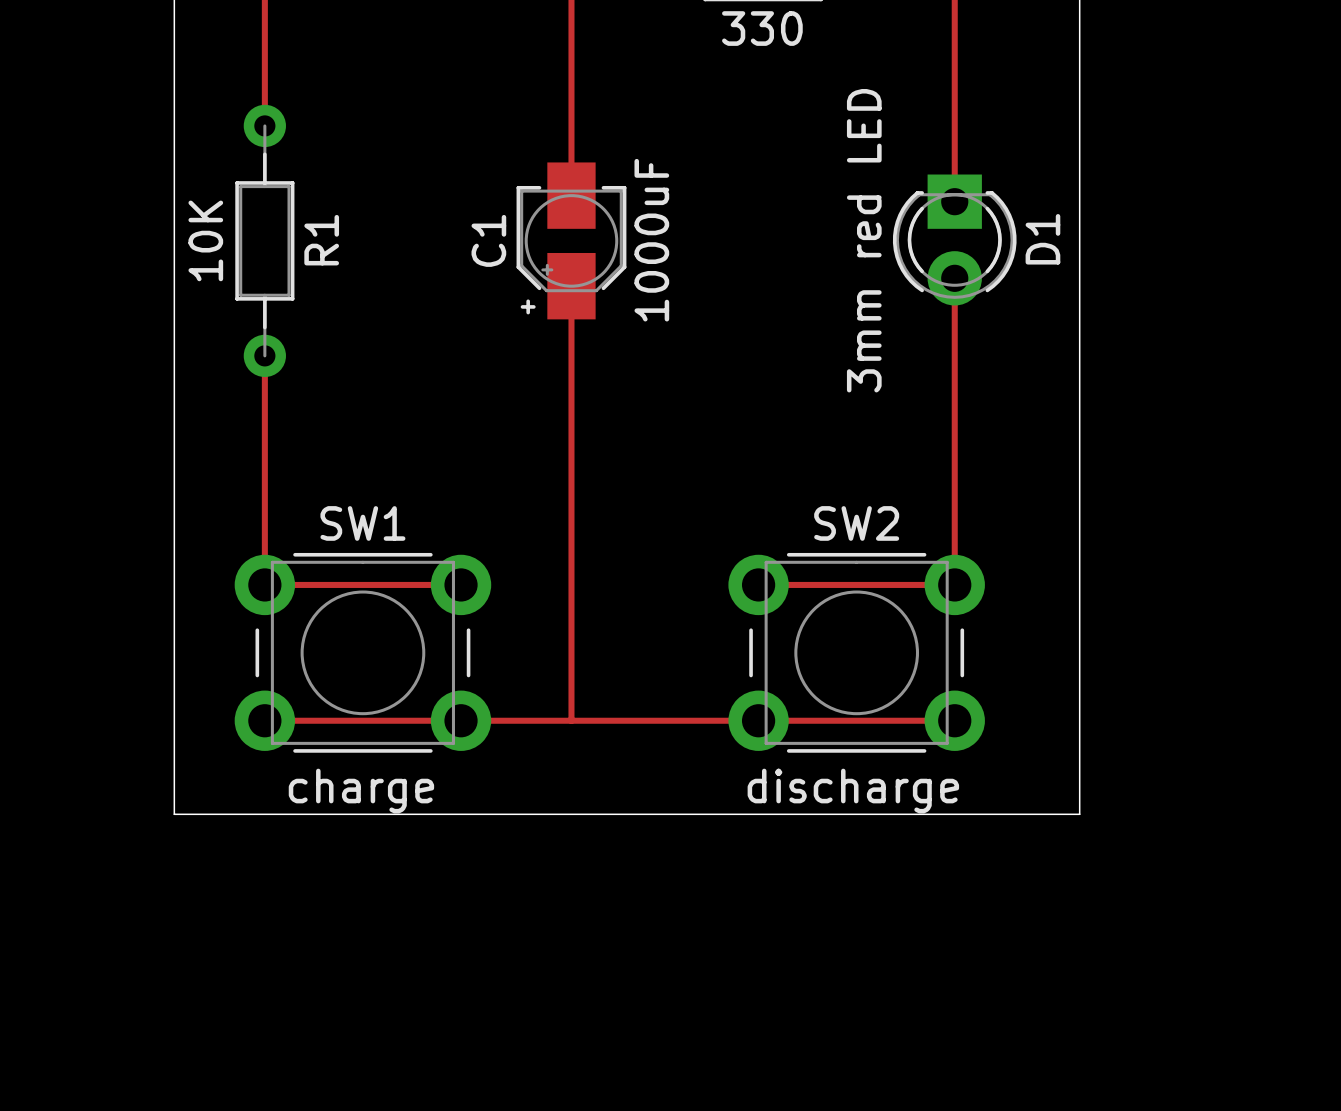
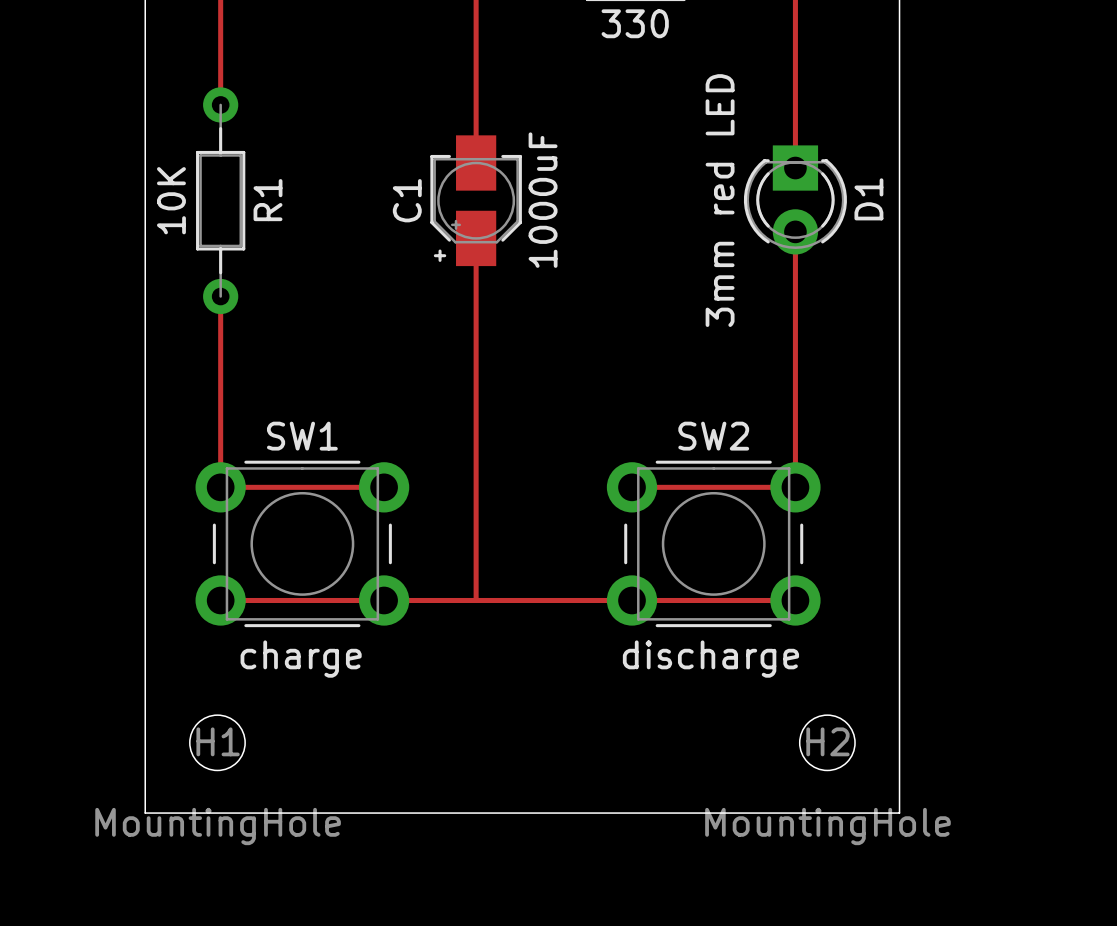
board edge: (174, 814) (1079, 814) -> (145, 678) (145, 813) (899, 813) (899, 678)
H1: none -> MountingHole (217, 742)
H2: none -> MountingHole (827, 742)

